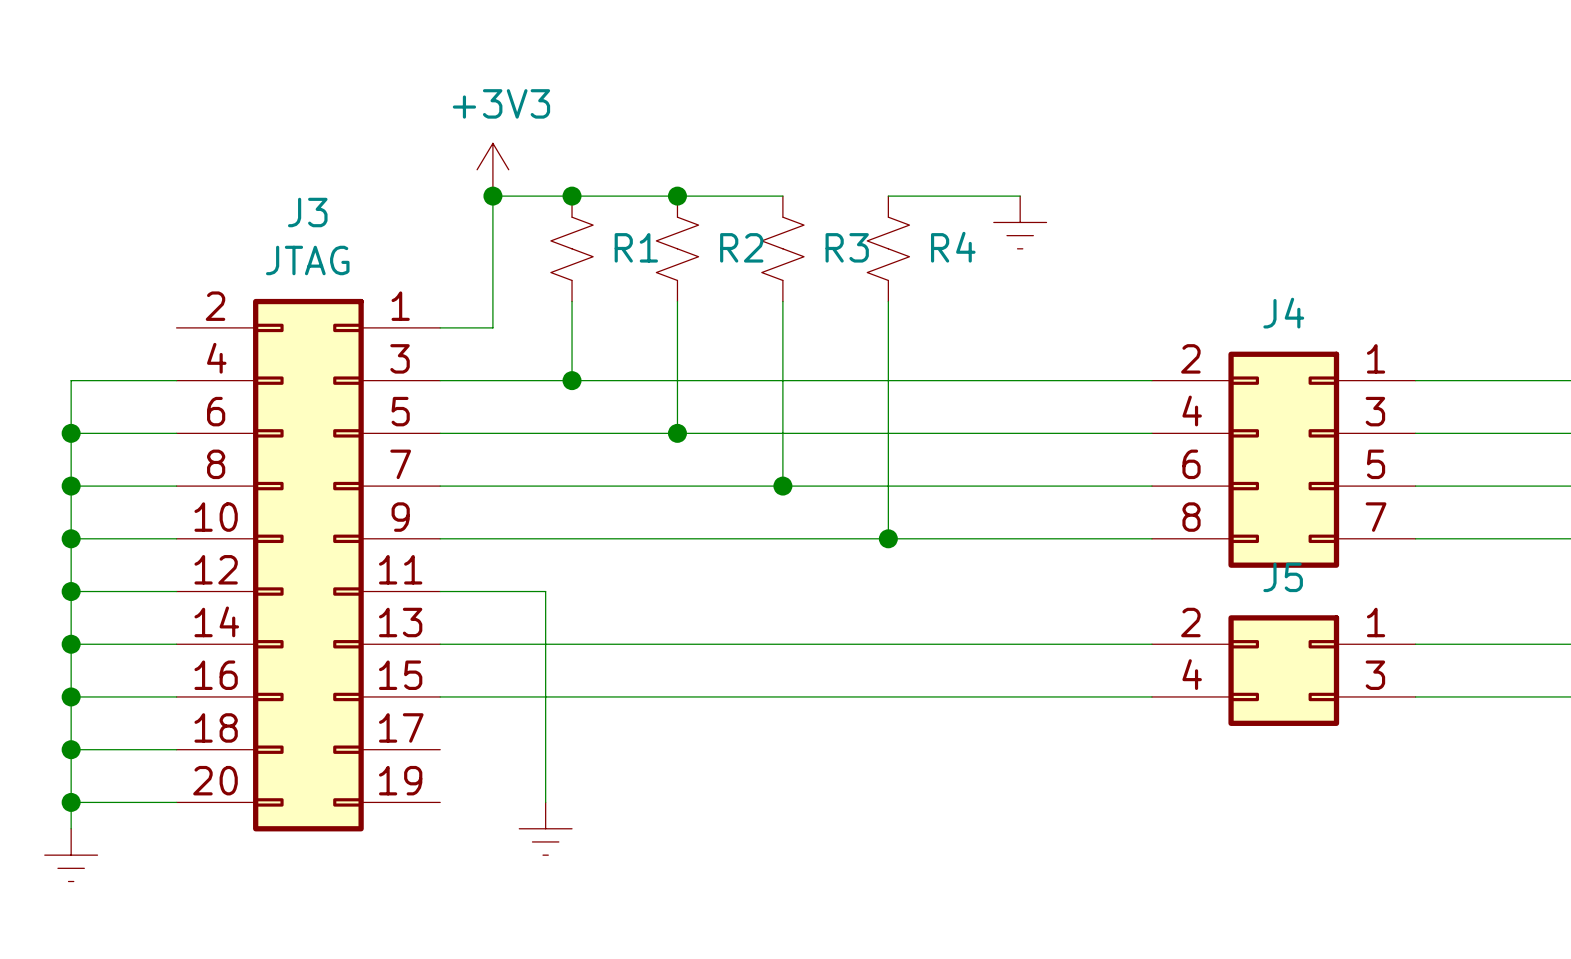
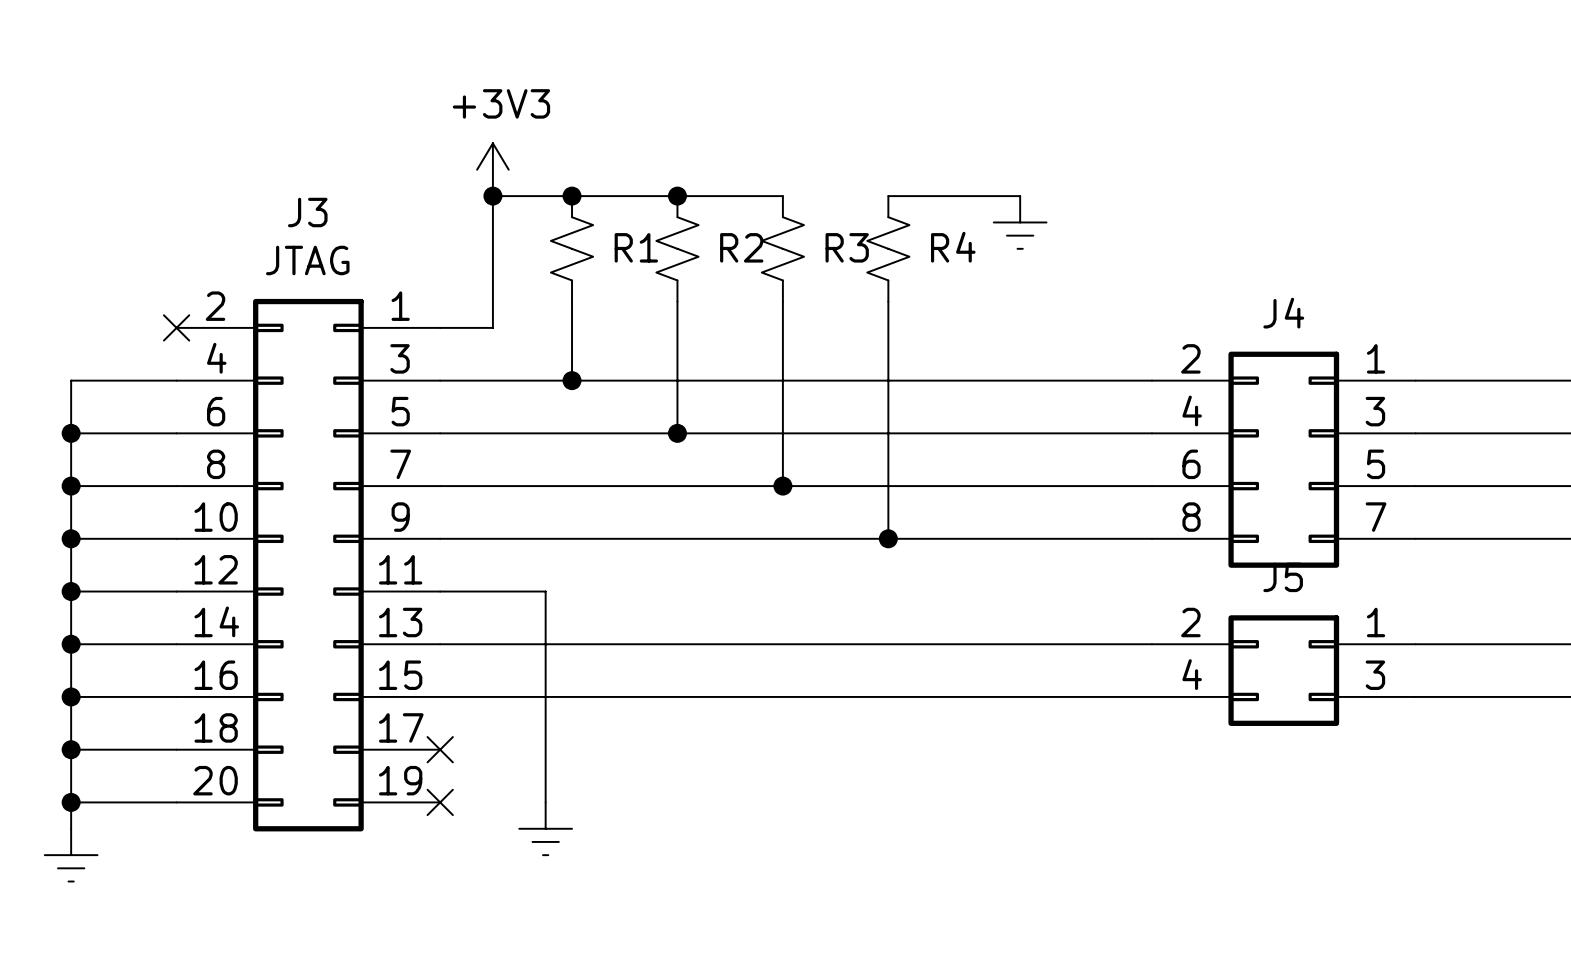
no-connect mark: none -> (176, 327)
no-connect mark: none -> (440, 749)
no-connect mark: none -> (440, 802)

